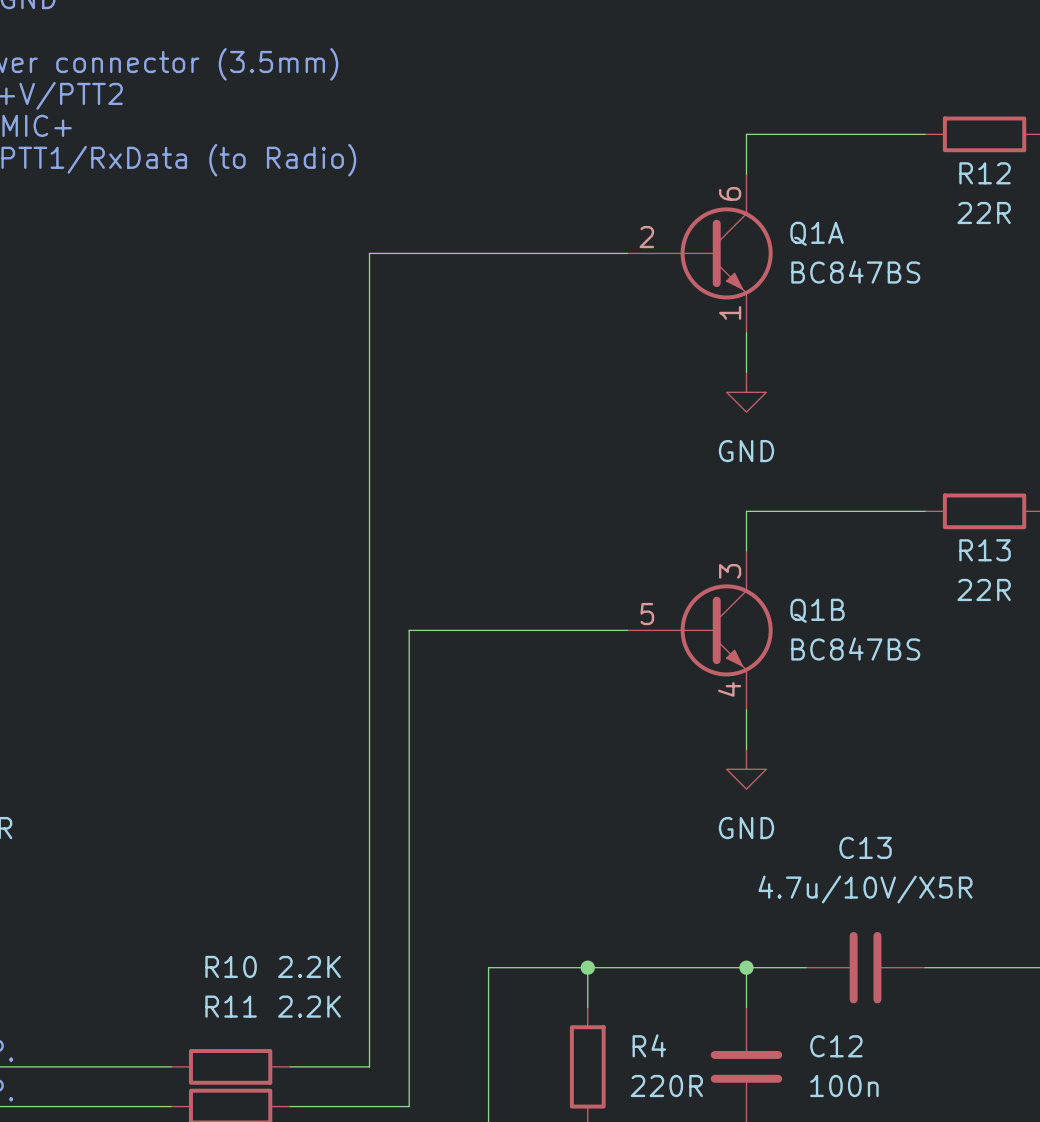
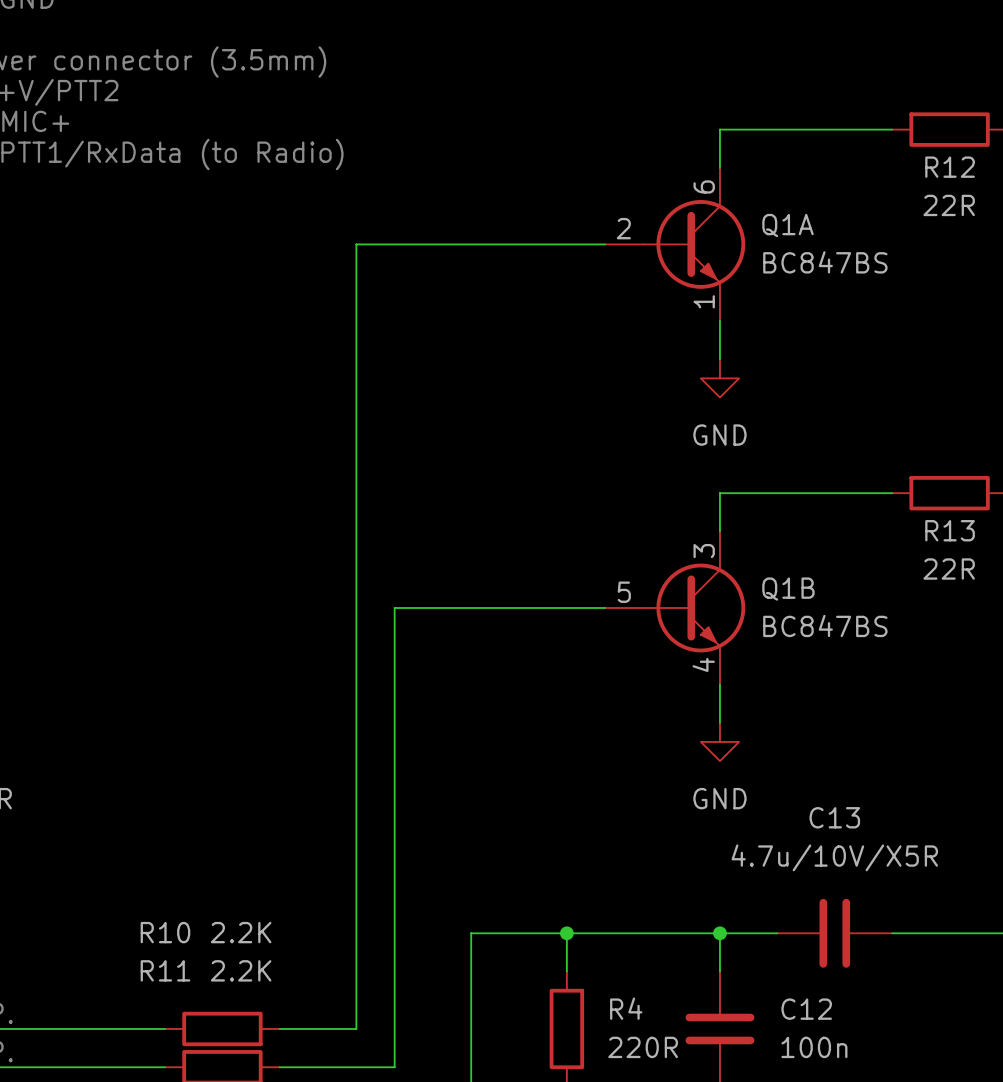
R10 name position: R10 (231, 966) -> R10 (165, 932)
R10 value position: 2.2K (309, 966) -> 2.2K (241, 932)
R11 name position: R11 (231, 1006) -> R11 (165, 970)
R11 value position: 2.2K (309, 1006) -> 2.2K (241, 970)

